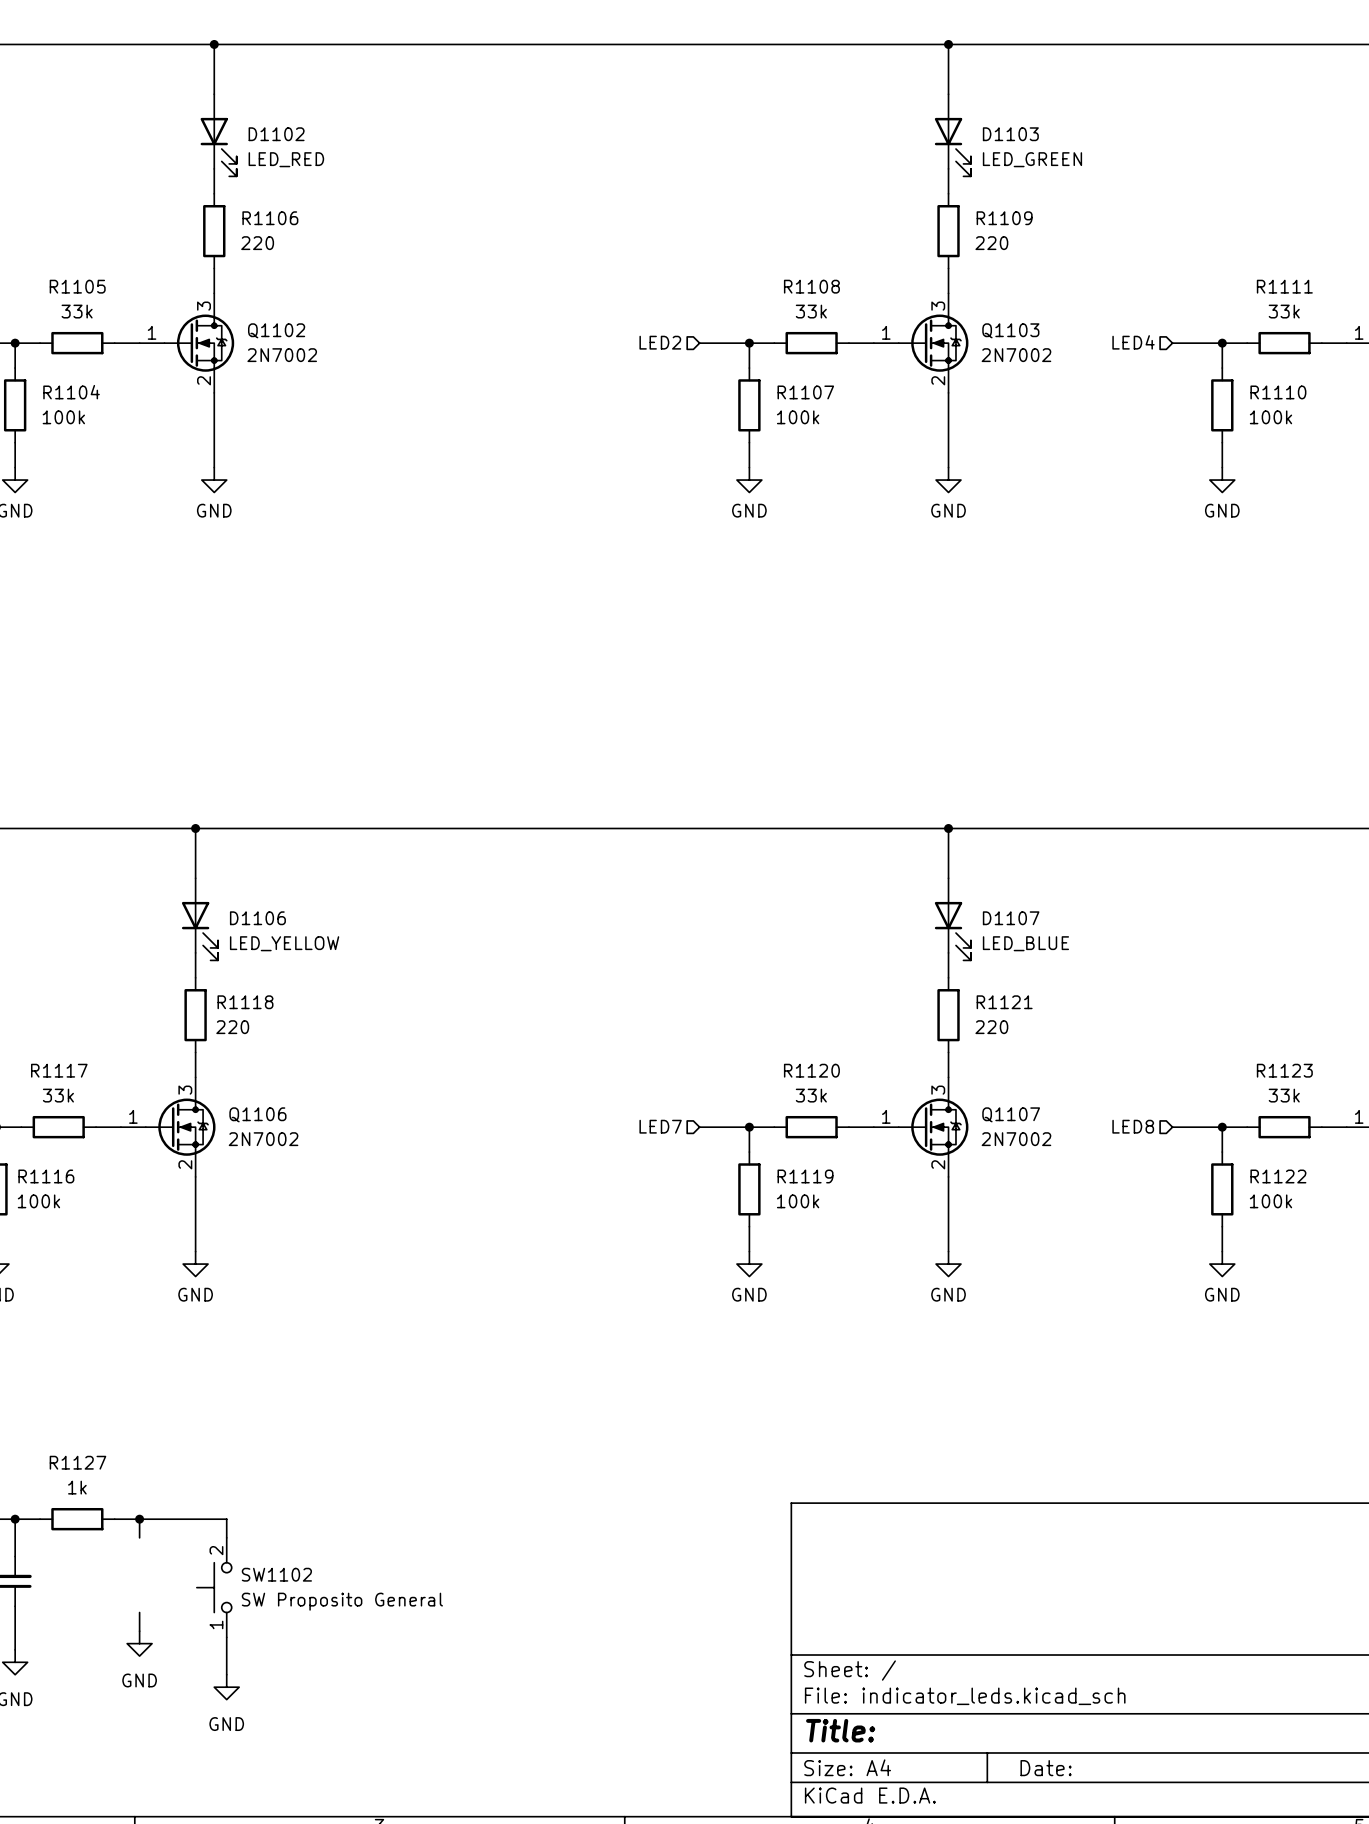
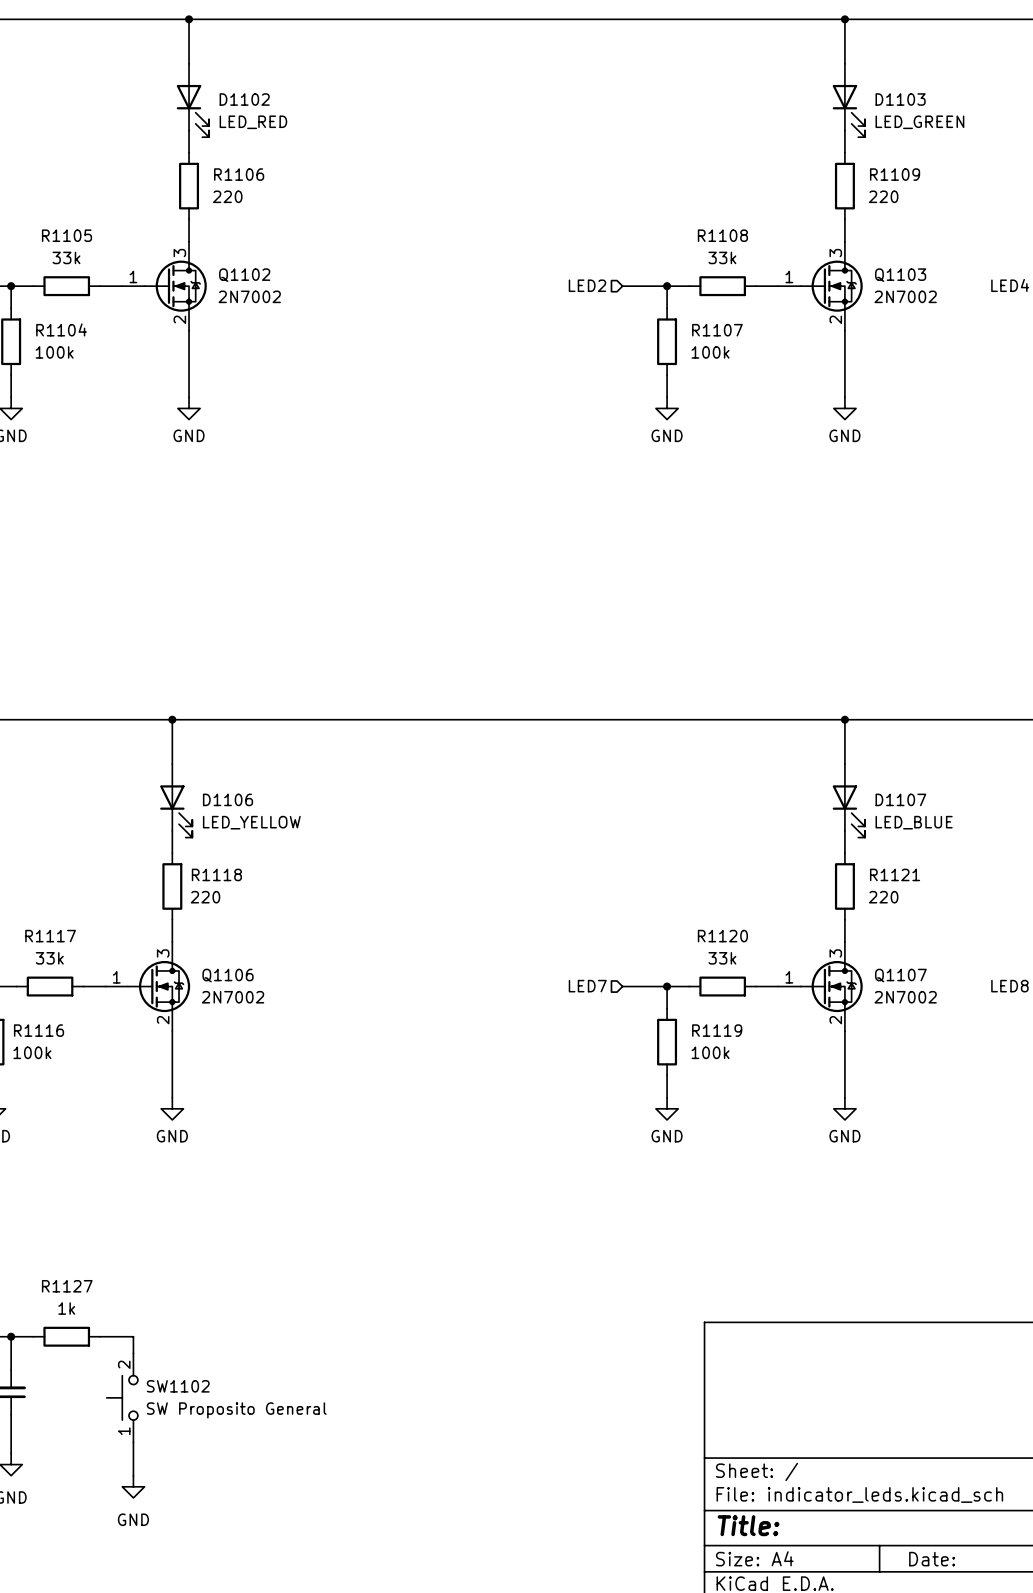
wire: (139, 1519) (139, 1537) -> none
junction: (139, 1519) -> none
wire: (152, 1519) (226, 1519) (226, 1537) -> (133, 1336) (133, 1353)
SW1102 position: (214, 1587) -> (122, 1397)
wire: (139, 1612) (139, 1631) -> none
wire: (226, 1637) (226, 1674) -> (133, 1442) (133, 1475)
power symbol: GND (139, 1643) -> none
power symbol: none -> GND (133, 1486)
power symbol: GND (226, 1687) -> none

